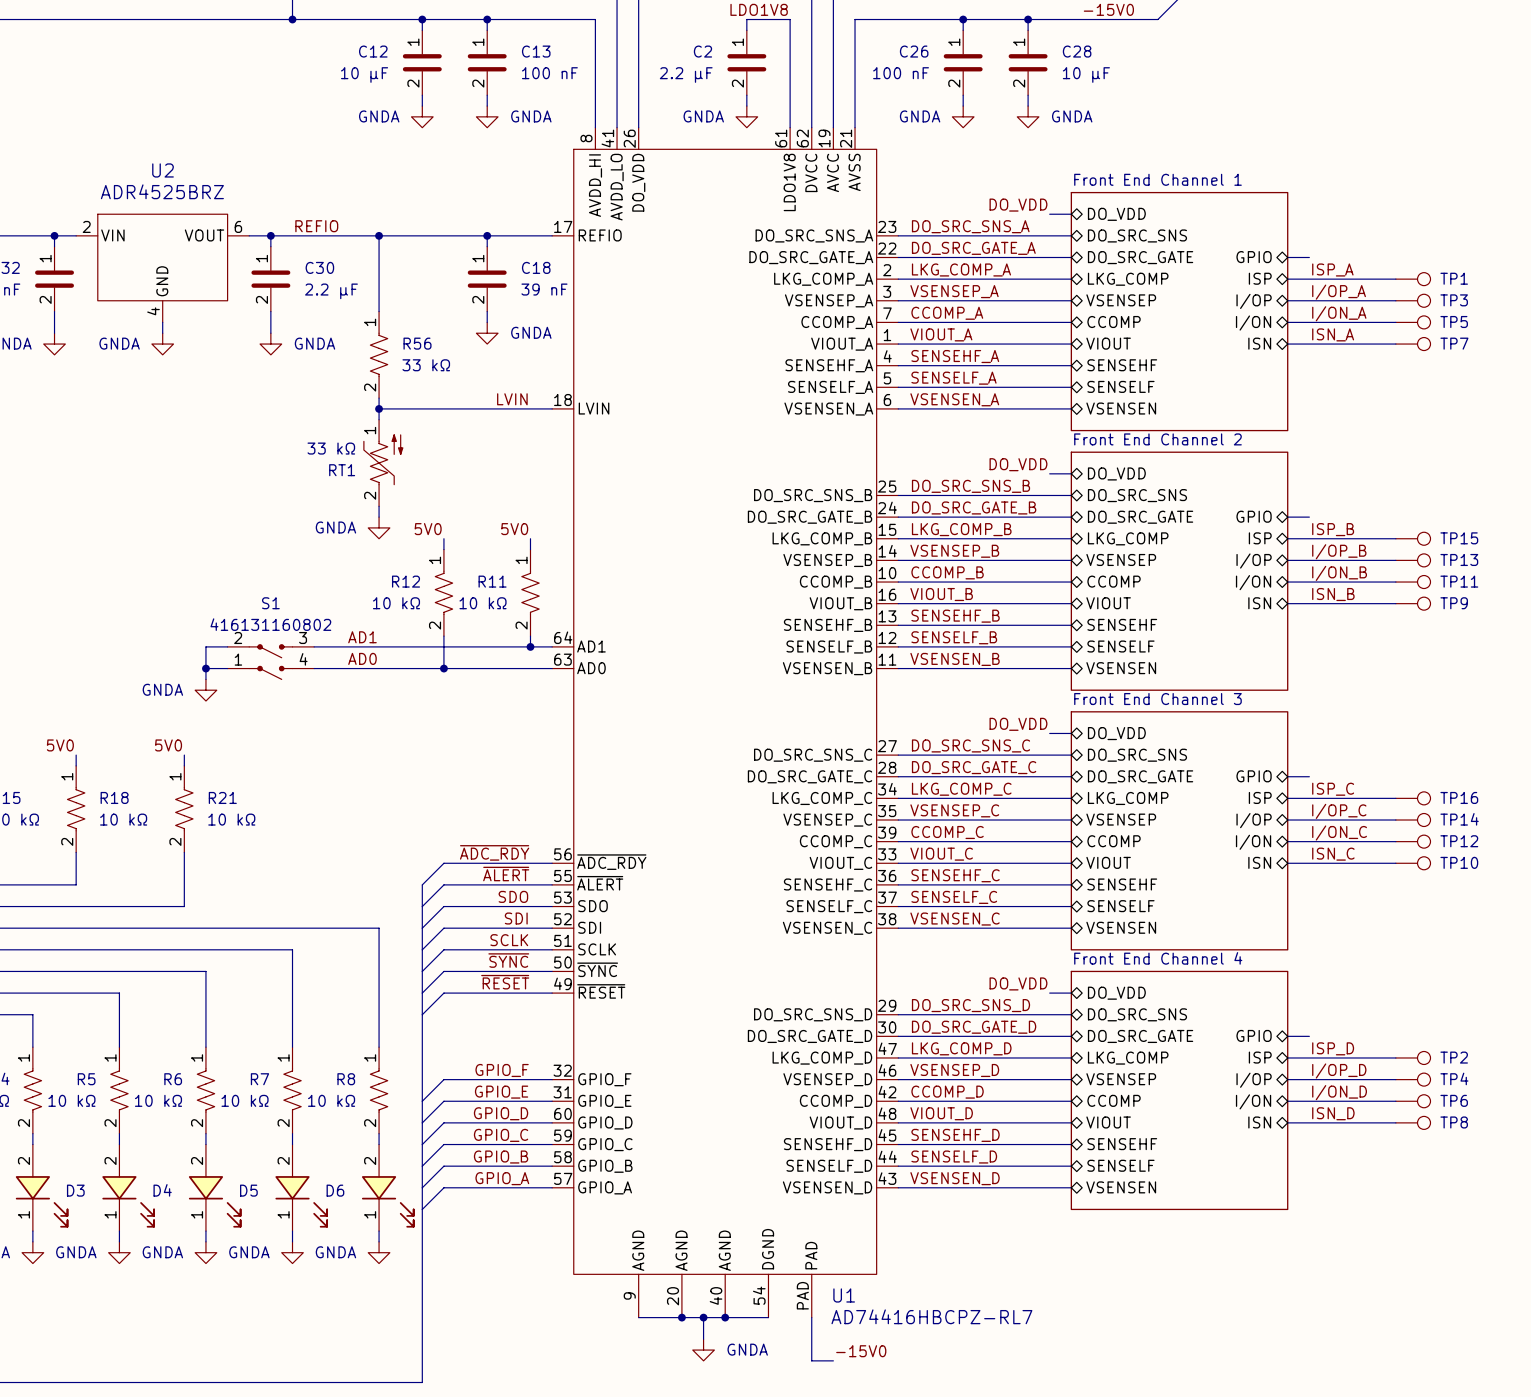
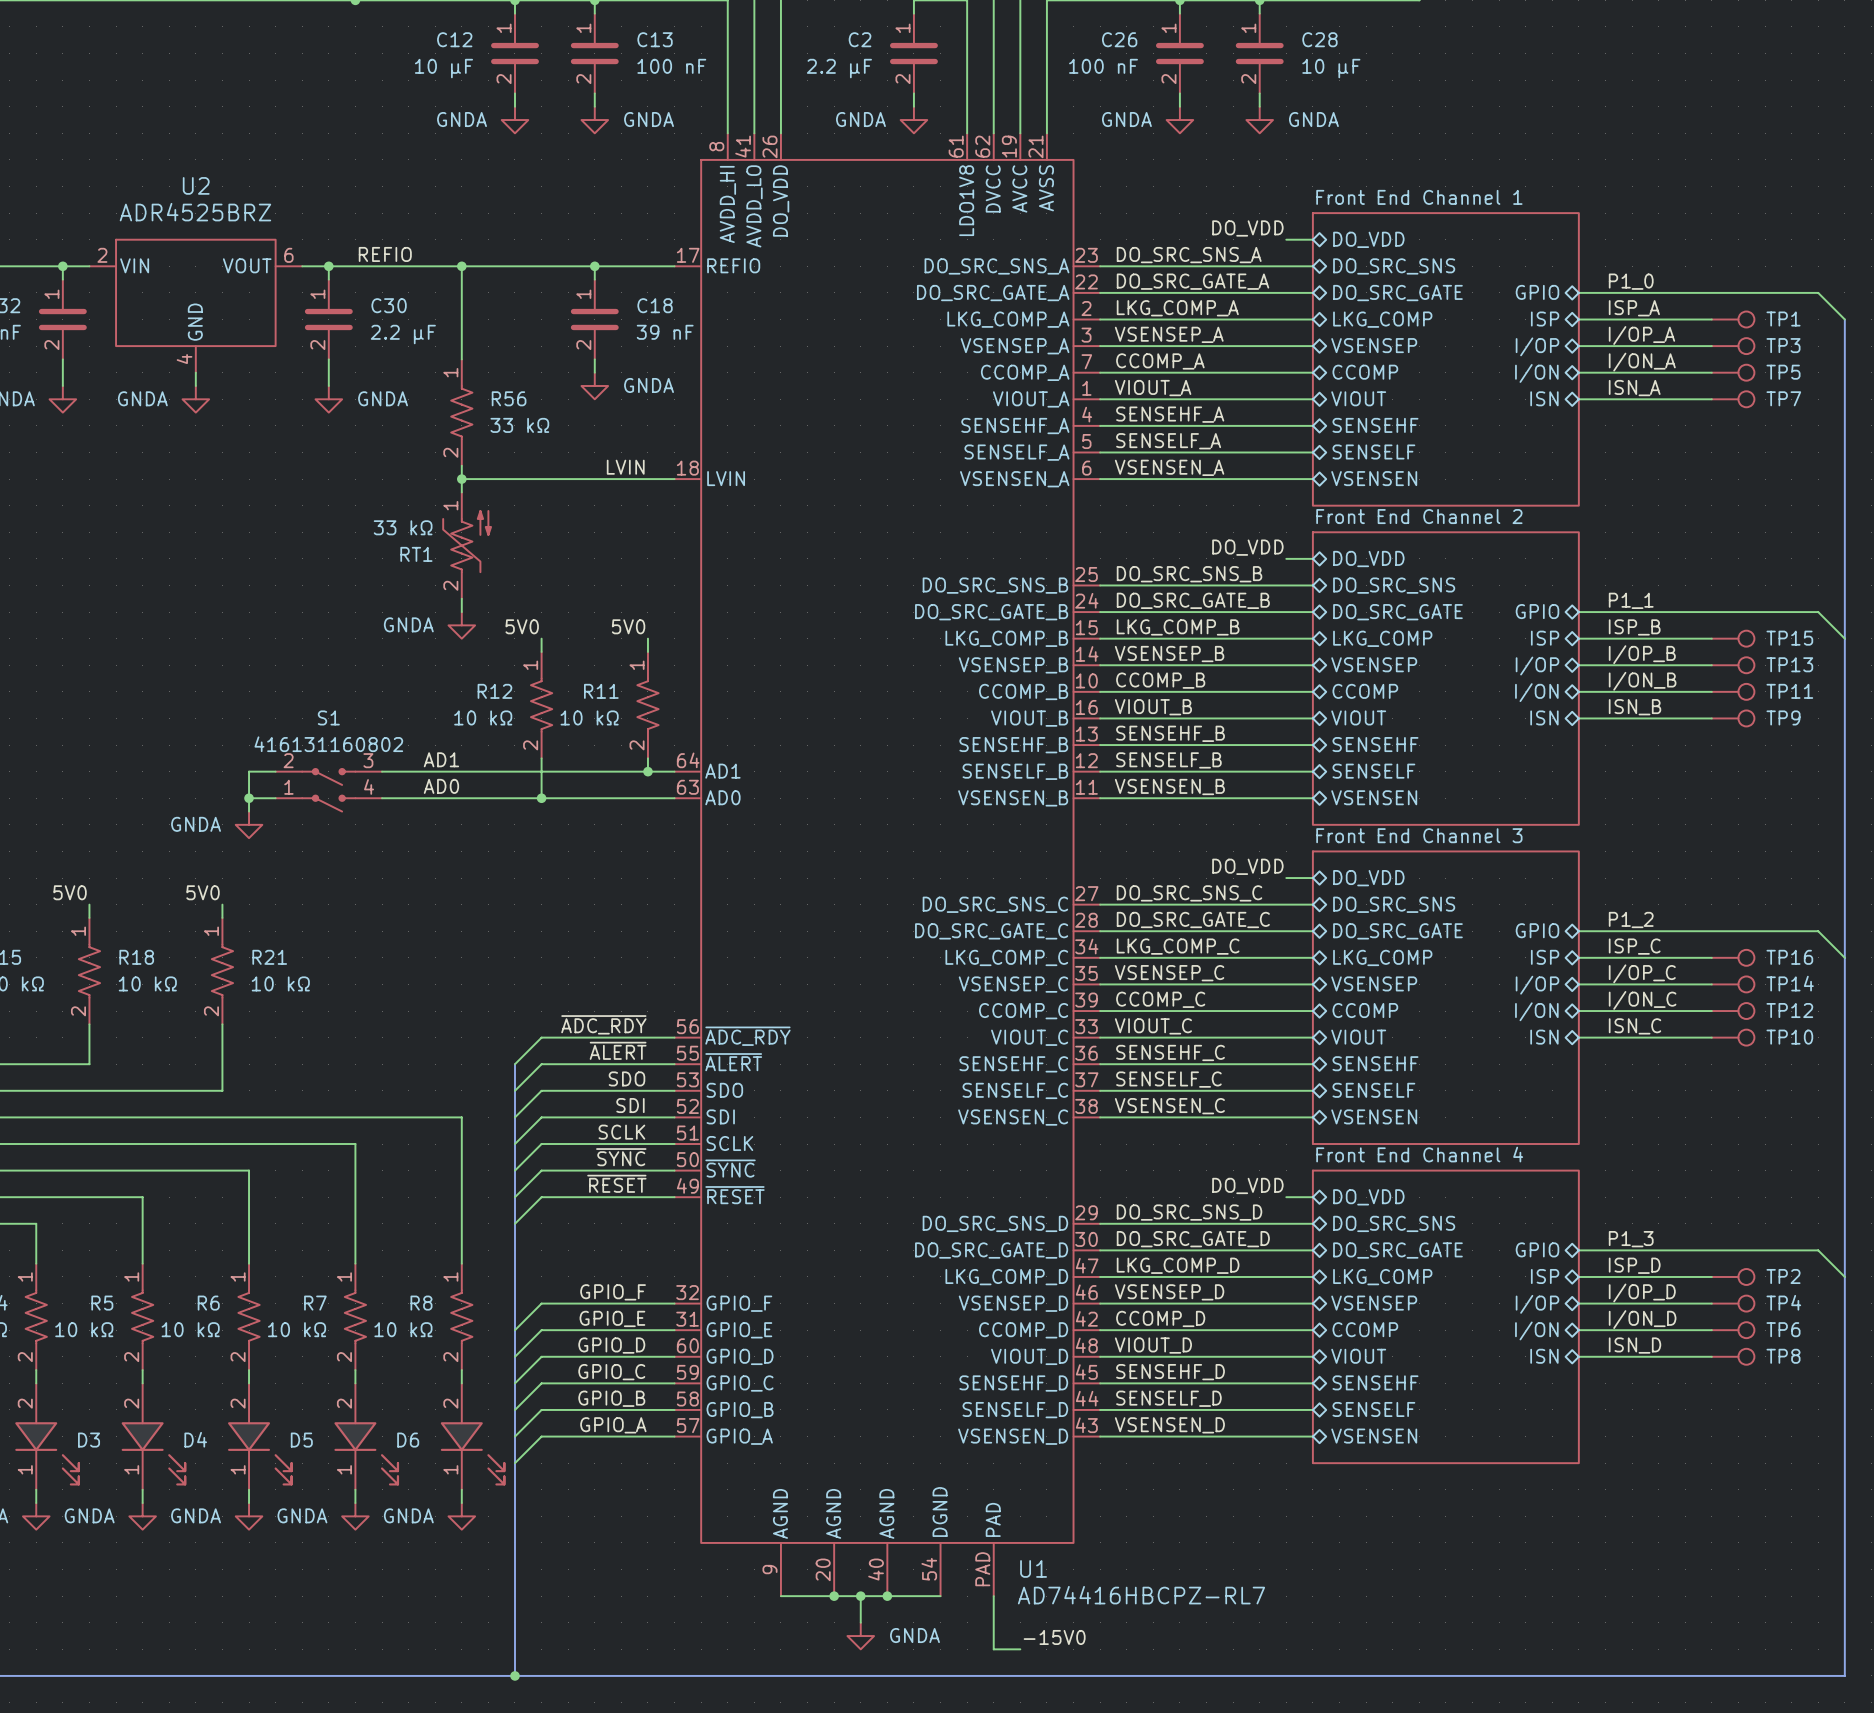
label: none -> P1_0 (1631, 281)
wire: none -> (1605, 292) (1818, 292) (1844, 319)
bus: none -> (1844, 319) (1844, 1675) (514, 1675)
label: none -> P1_1 (1631, 600)
wire: none -> (1605, 612) (1818, 612) (1844, 638)
label: none -> P1_2 (1631, 919)
wire: none -> (1605, 931) (1818, 931) (1844, 957)
label: none -> P1_3 (1631, 1239)
wire: none -> (1605, 1250) (1818, 1250) (1844, 1276)
junction: none -> (514, 1675)

